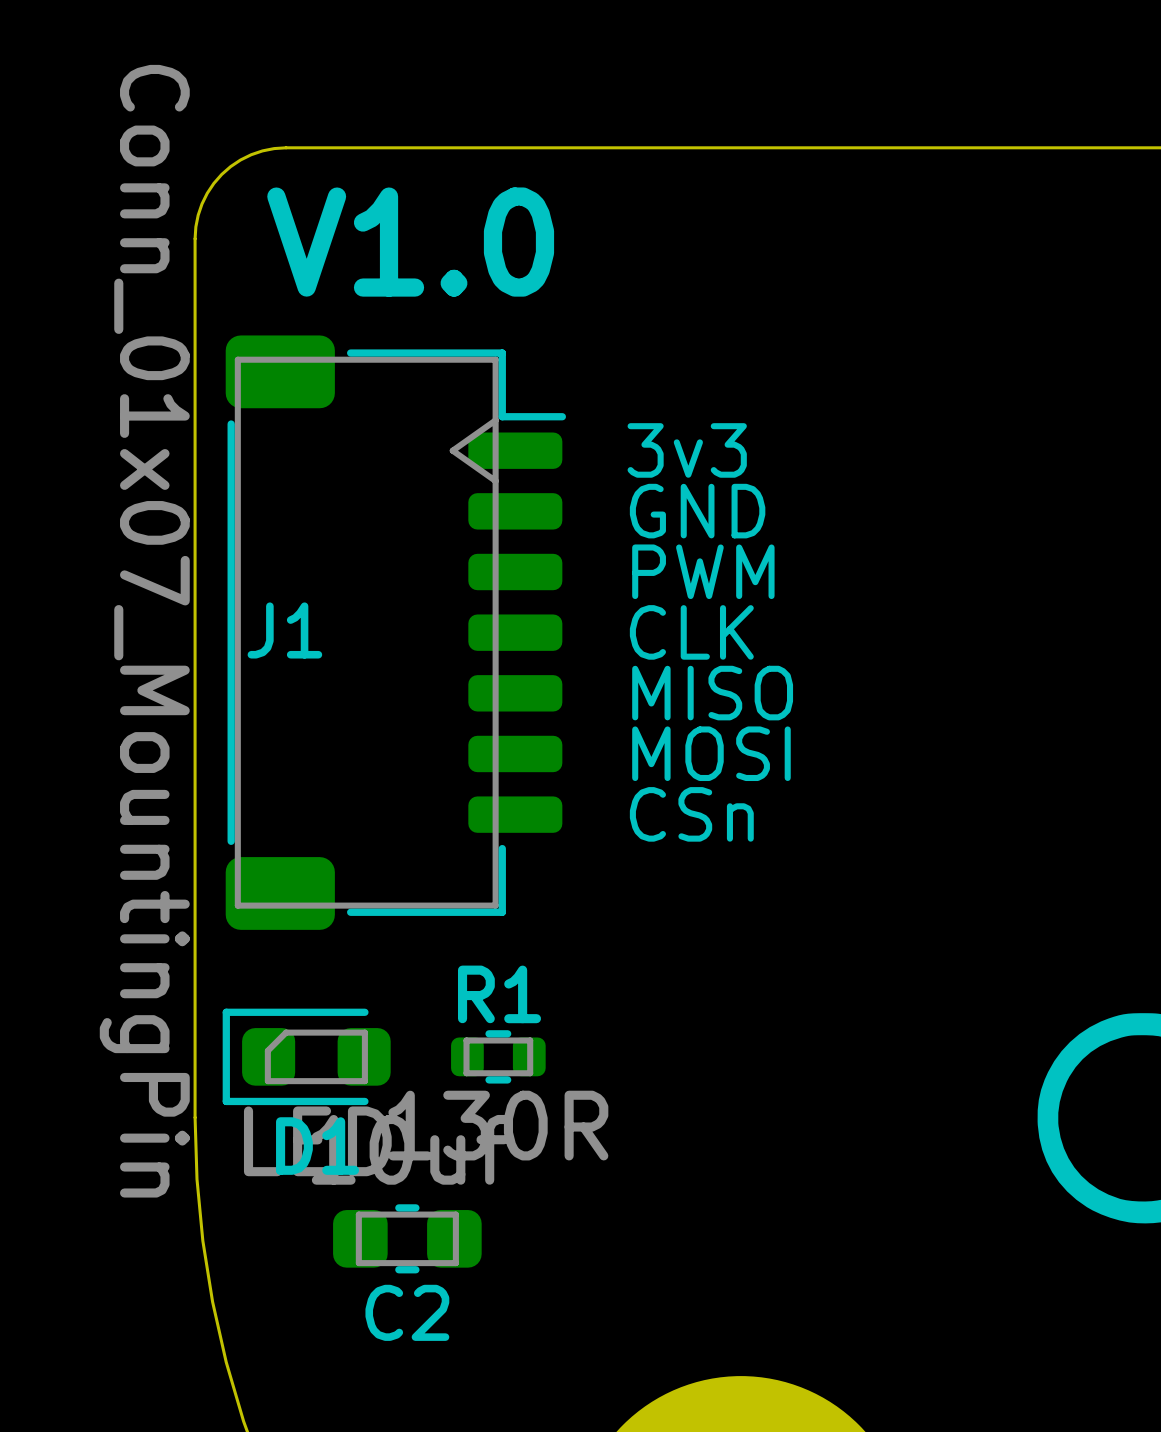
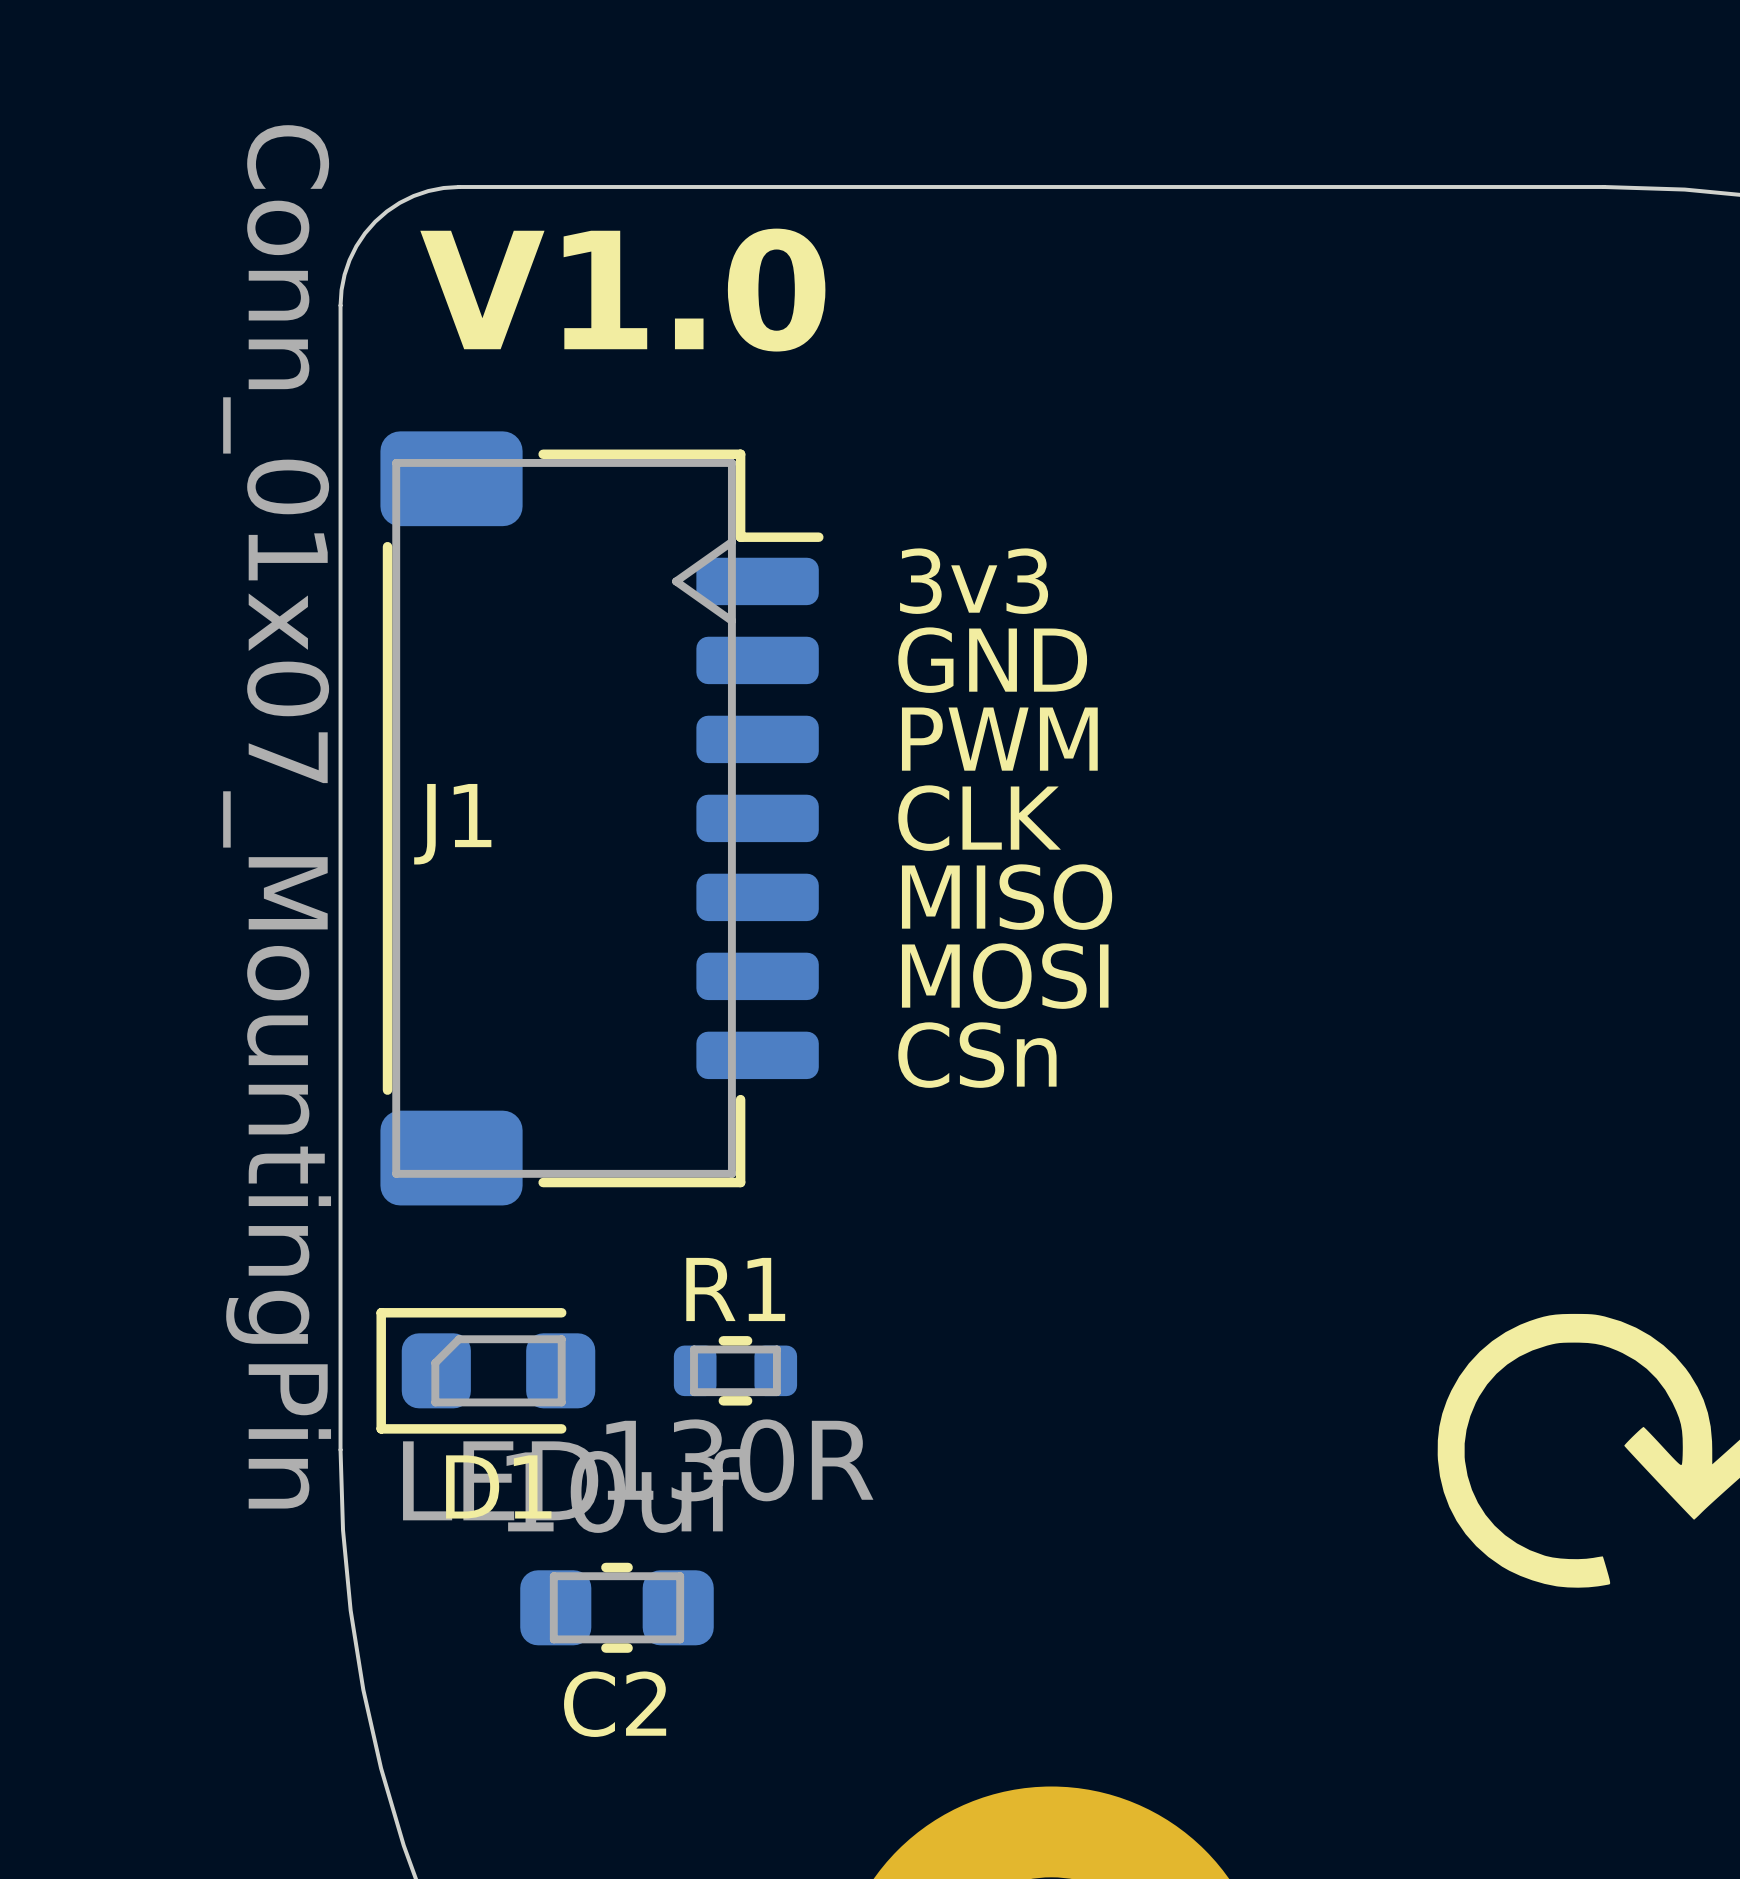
text position: V1.0 (410, 242) -> V1.0 (622, 290)

